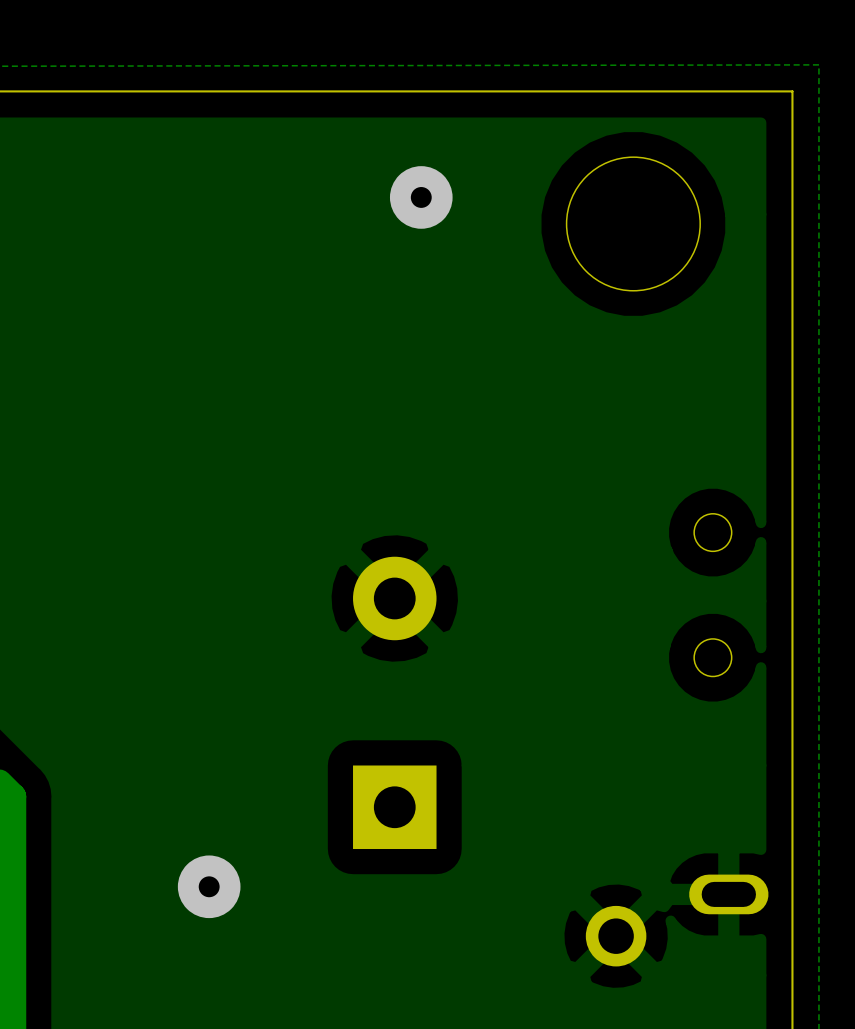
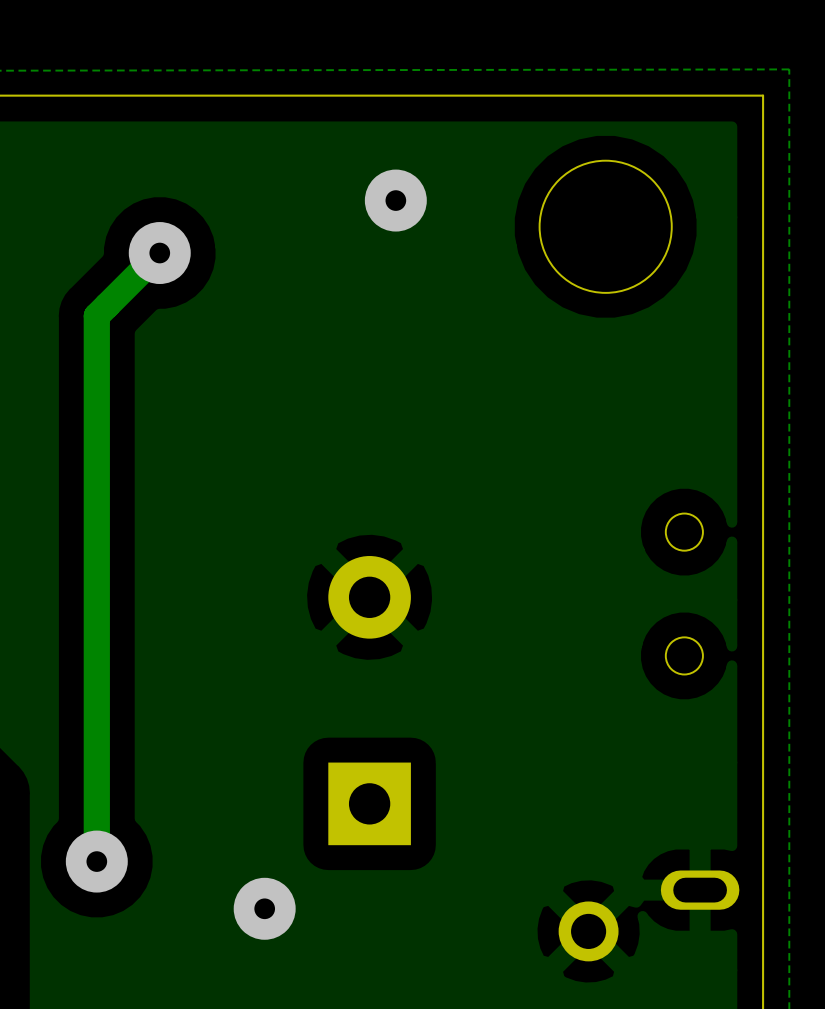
track: none -> (159, 253) (96, 315) (96, 861)
via: none -> (159, 253)
via: none -> (96, 861)
via: (209, 886) -> none
via: none -> (264, 908)

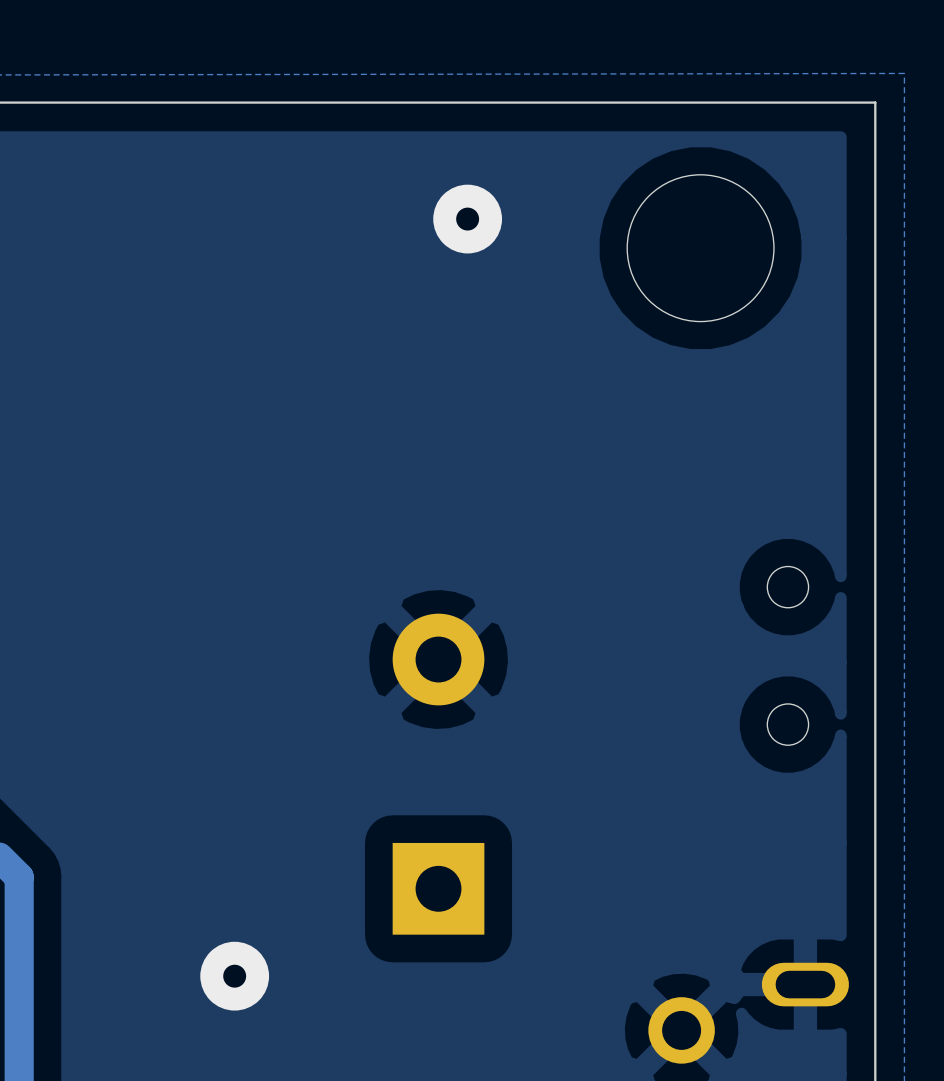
track: (159, 253) (96, 315) (96, 861) -> none
via: (159, 253) -> none
via: (96, 861) -> none
via: none -> (234, 976)
via: (264, 908) -> none

